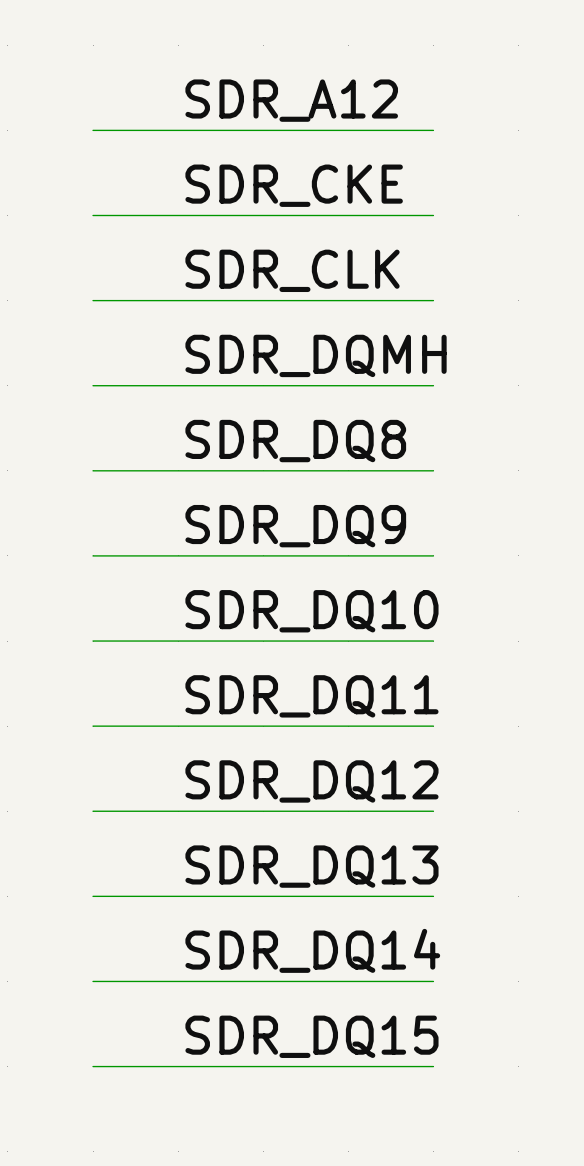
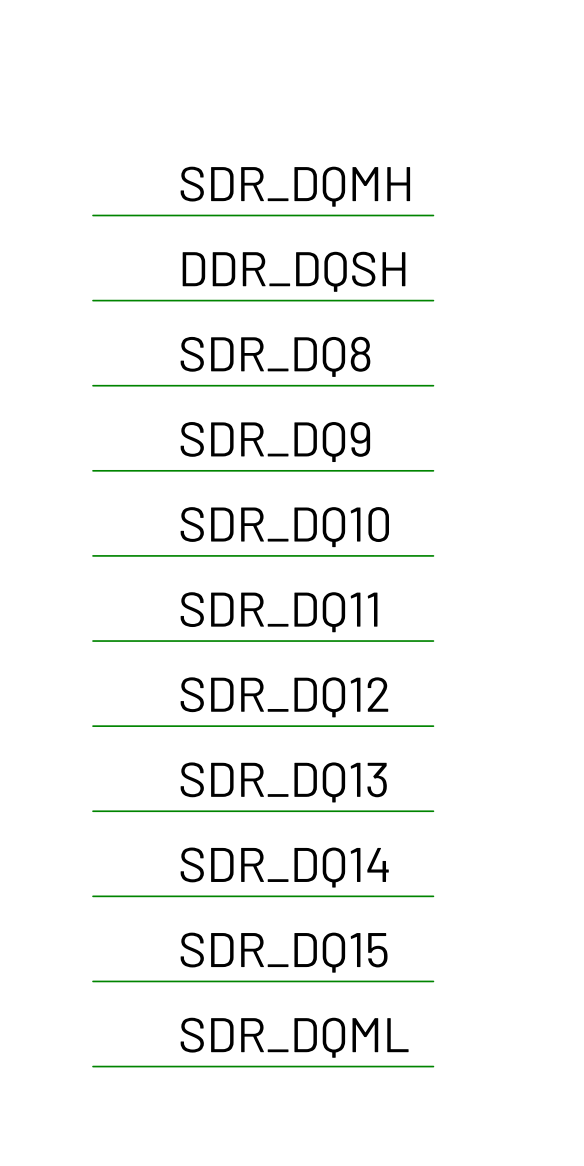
label: SDR_A12 (291, 100) -> none
wire: (93, 130) (433, 130) -> none
label: SDR_CKE (294, 185) -> SDR_DQMH (295, 186)
label: SDR_CLK (292, 270) -> DDR_DQSH (294, 271)
label: SDR_DQMH (316, 355) -> SDR_DQ8 (275, 356)
label: SDR_DQ8 (295, 441) -> SDR_DQ9 (275, 442)
label: SDR_DQ9 (295, 526) -> SDR_DQ10 (284, 527)
label: SDR_DQ10 (311, 611) -> SDR_DQ11 (279, 612)
label: SDR_DQ11 (311, 696) -> SDR_DQ12 (284, 697)
label: SDR_DQ12 (311, 781) -> SDR_DQ13 (283, 782)
label: SDR_DQ13 (311, 866) -> SDR_DQ14 (284, 867)
label: SDR_DQ14 (312, 950) -> SDR_DQ15 (284, 952)
label: SDR_DQ15 (311, 1036) -> SDR_DQML (294, 1037)

